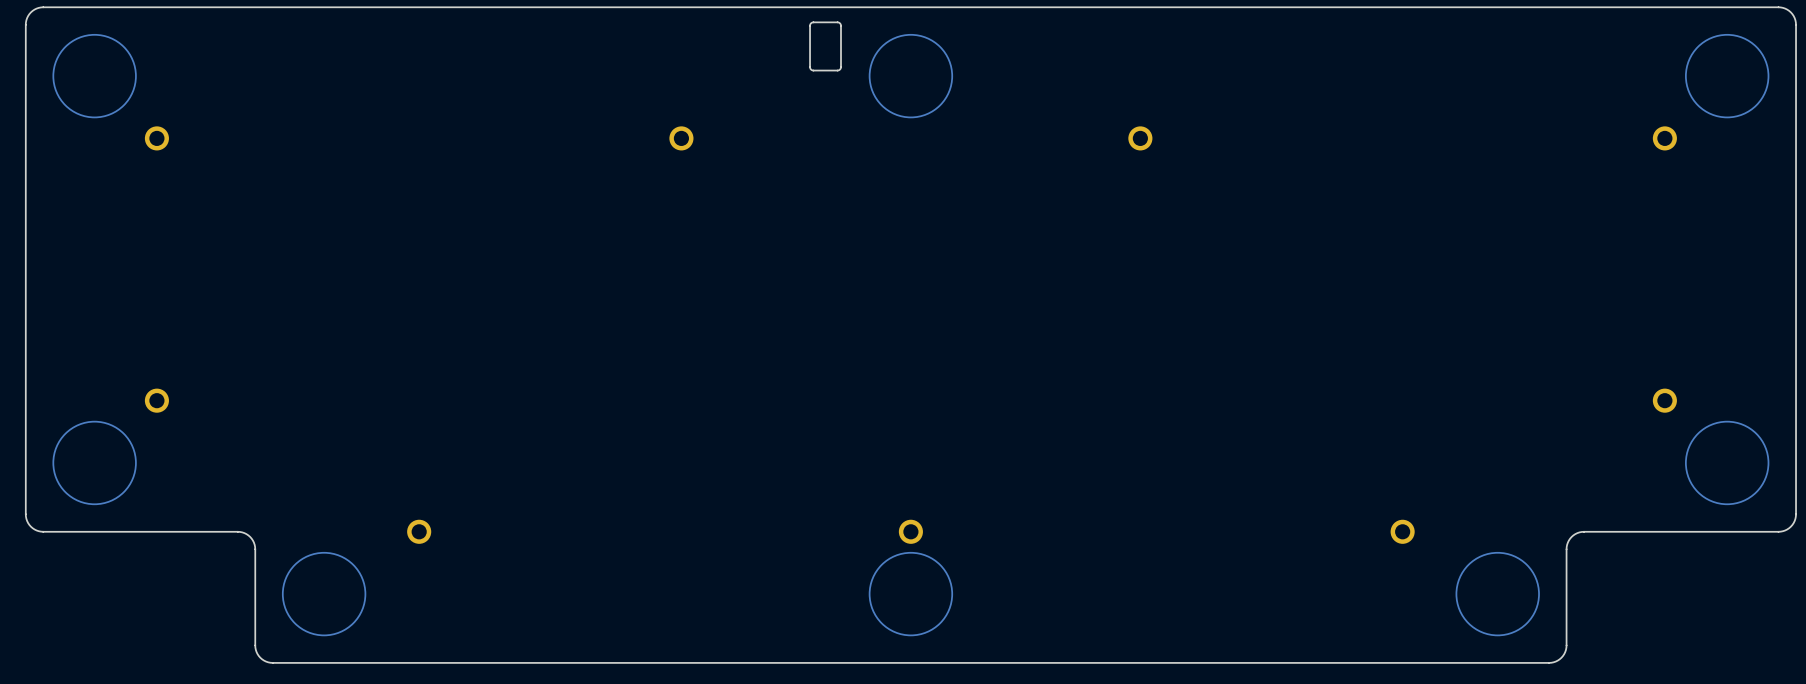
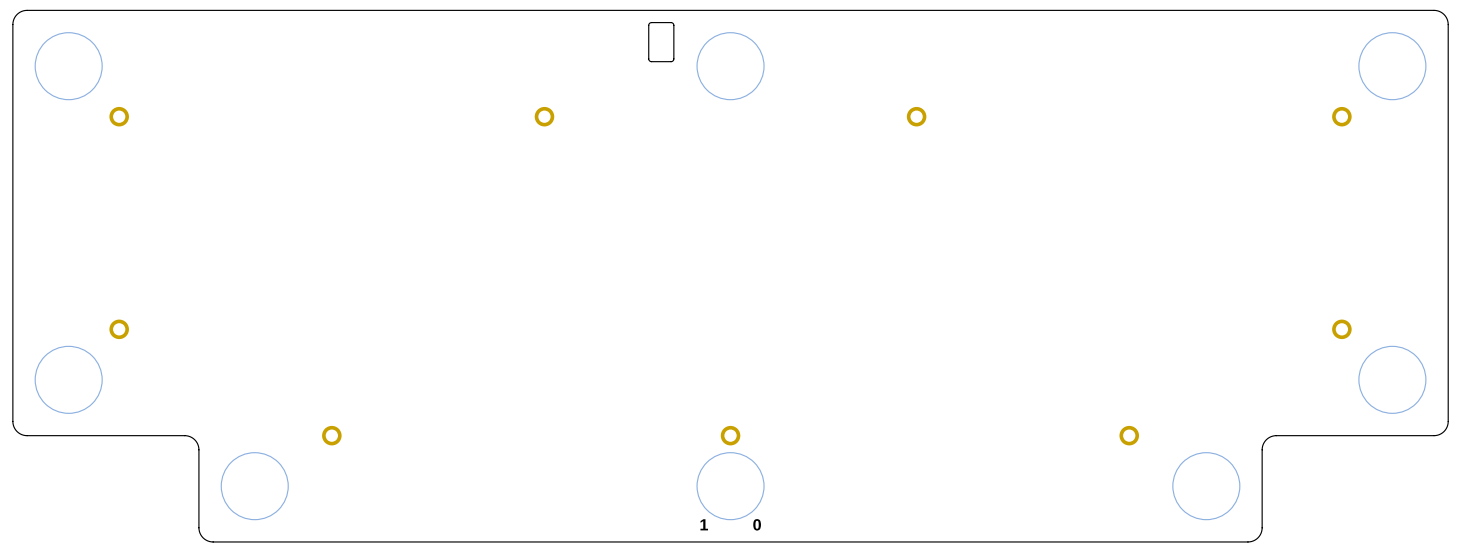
text: none -> 1 (704, 524)
text: none -> 0 (757, 524)

